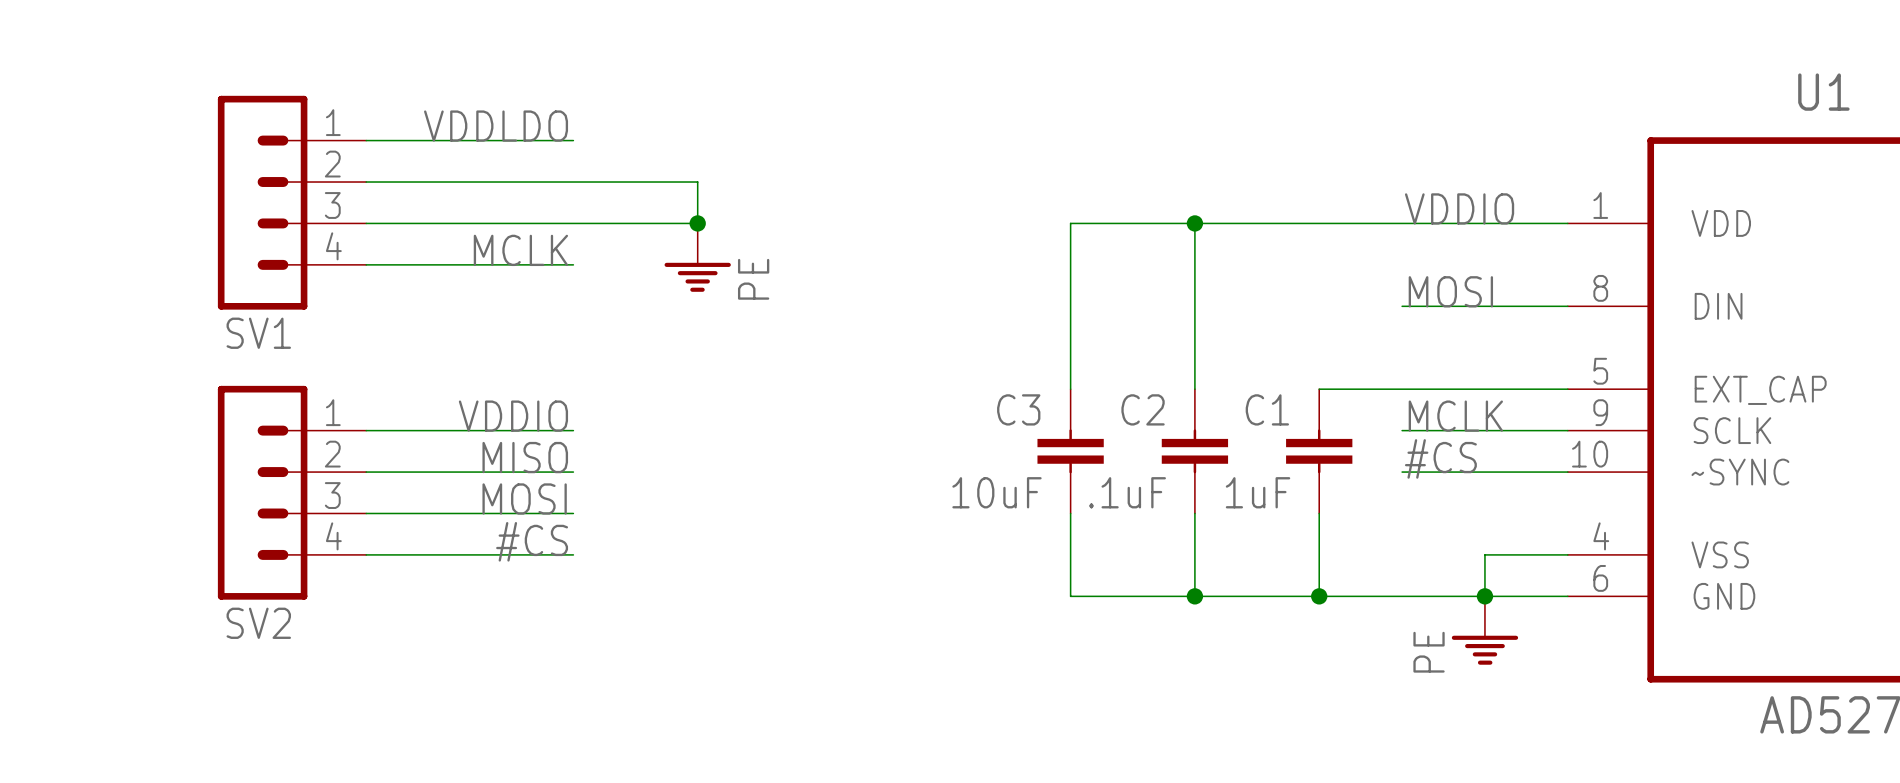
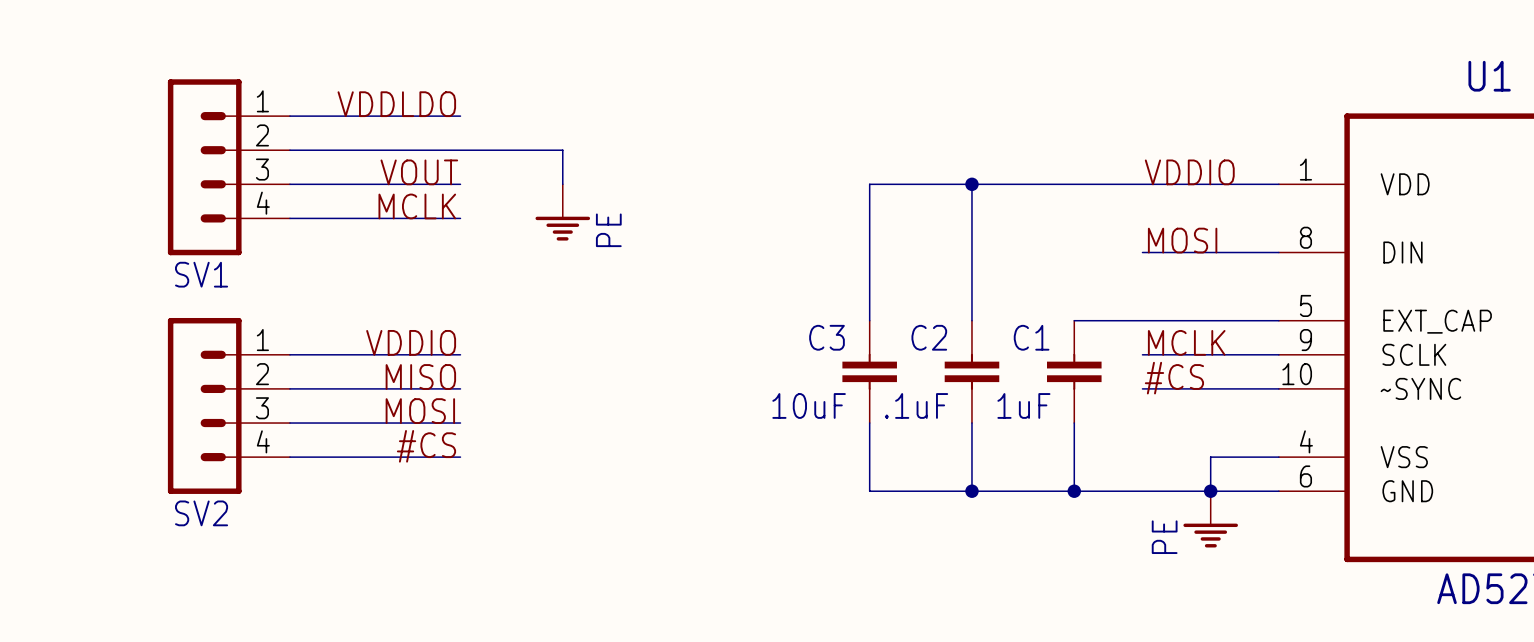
label: none -> VOUT (419, 172)
wire: (573, 223) (697, 223) -> none
junction: (697, 223) -> none

